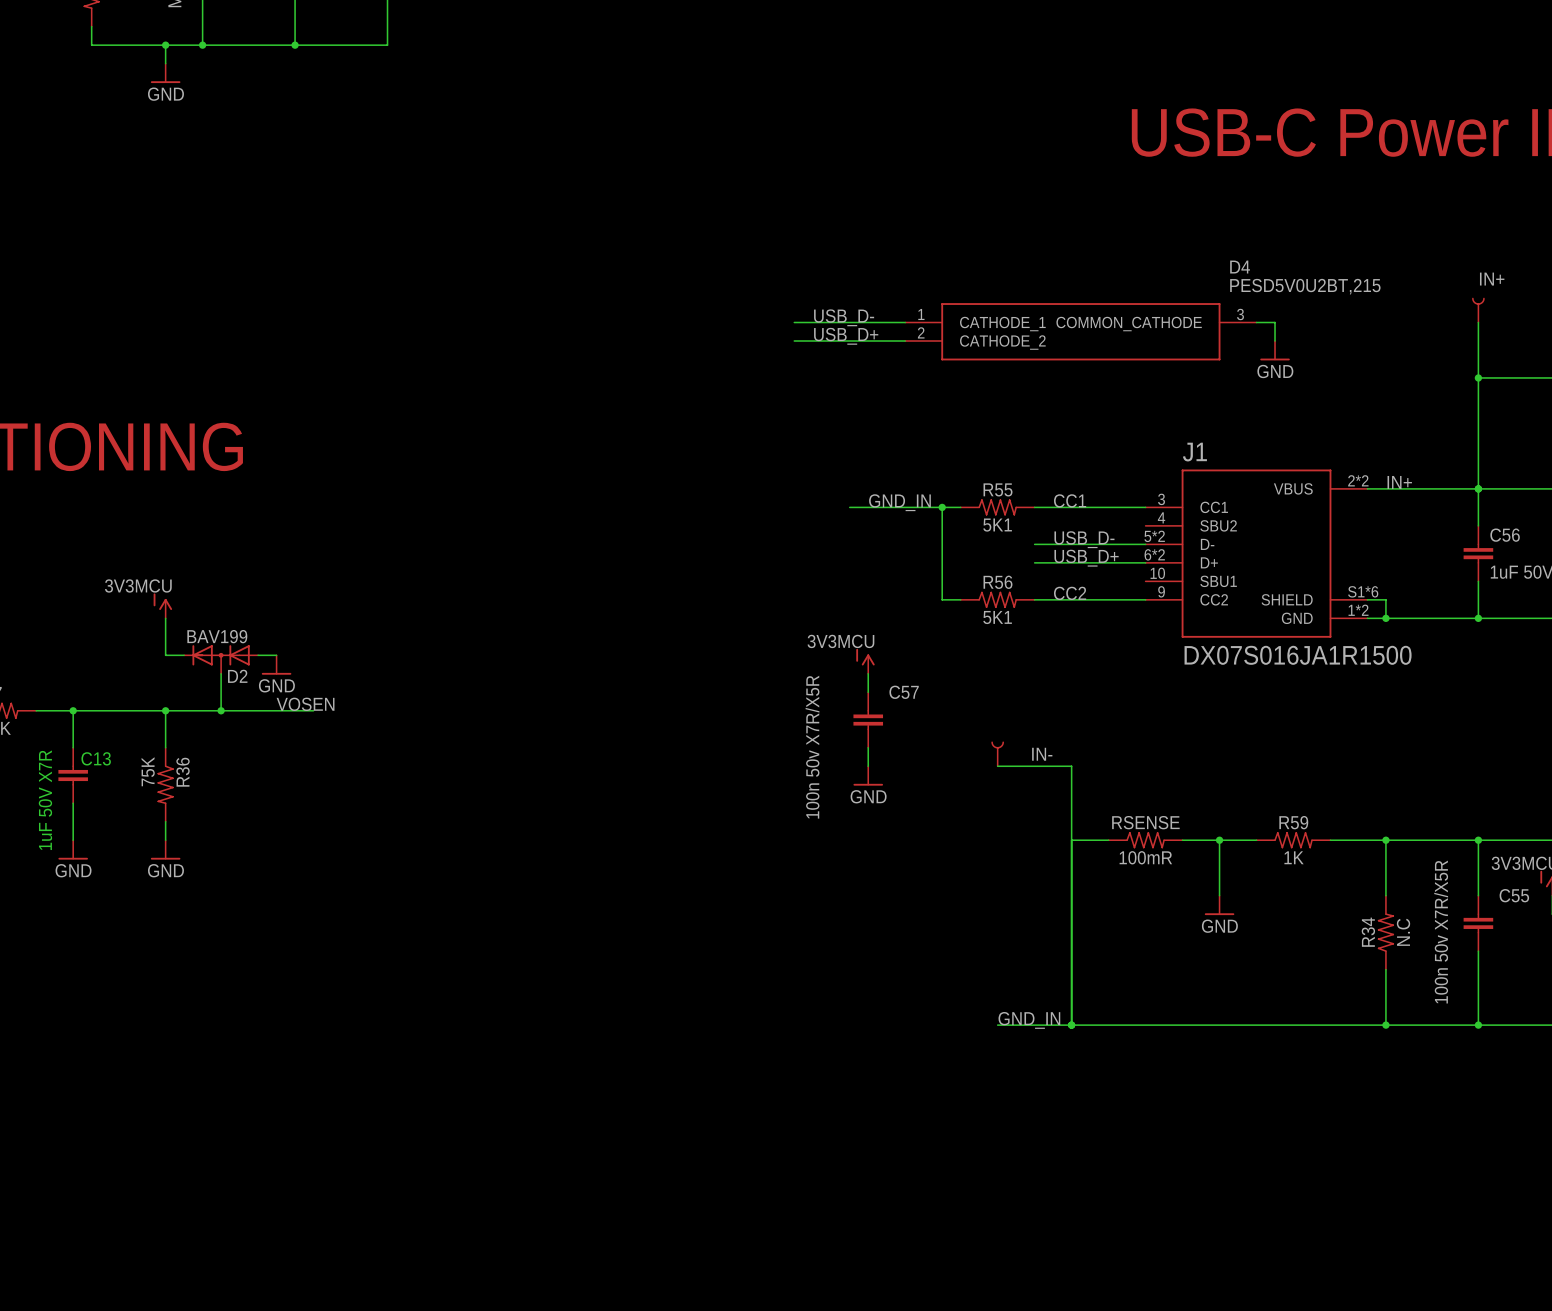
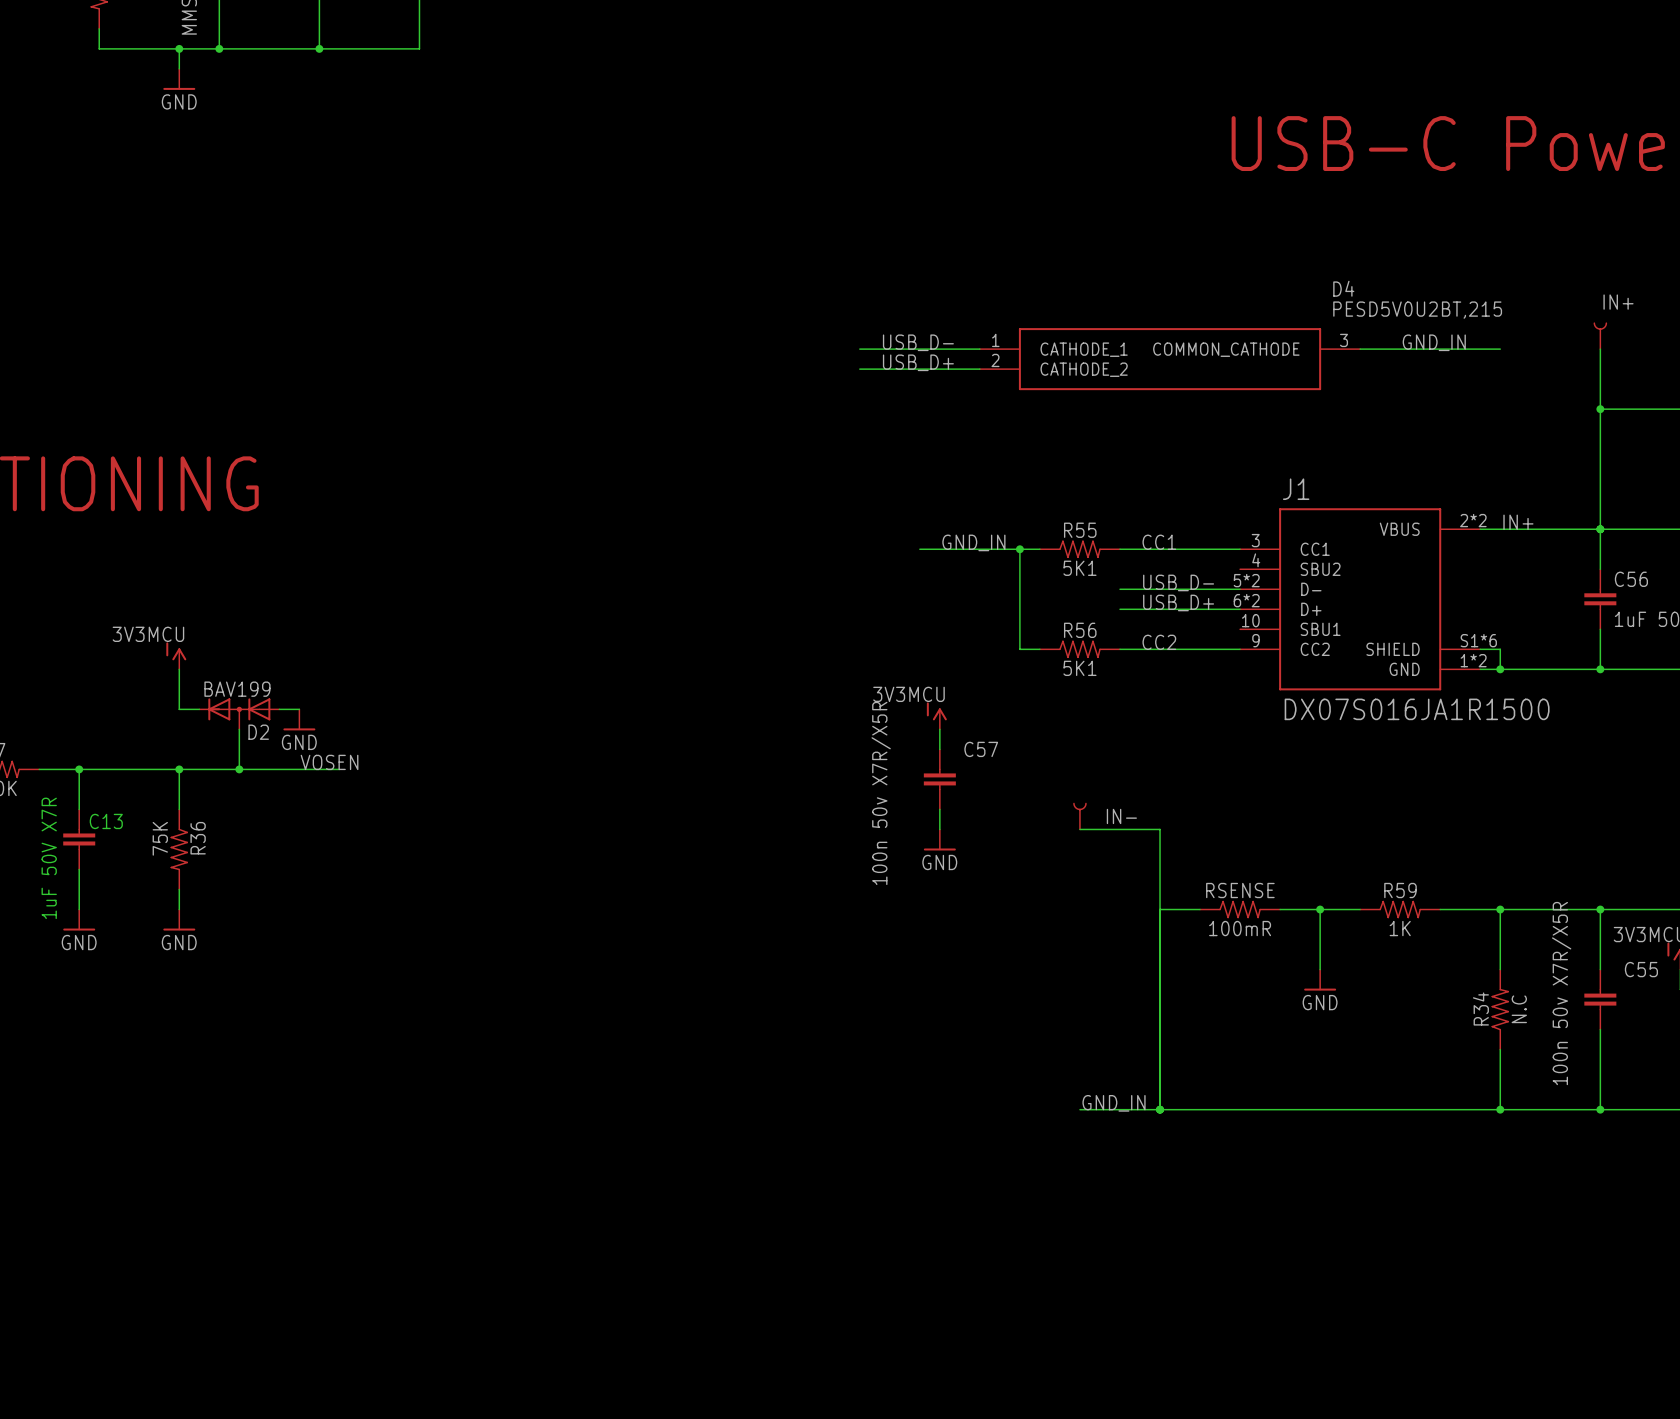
label: none -> GND_IN (1434, 342)
wire: (1275, 322) (1275, 340) -> (1380, 349) (1500, 349)
power symbol: GND (1275, 350) -> none

